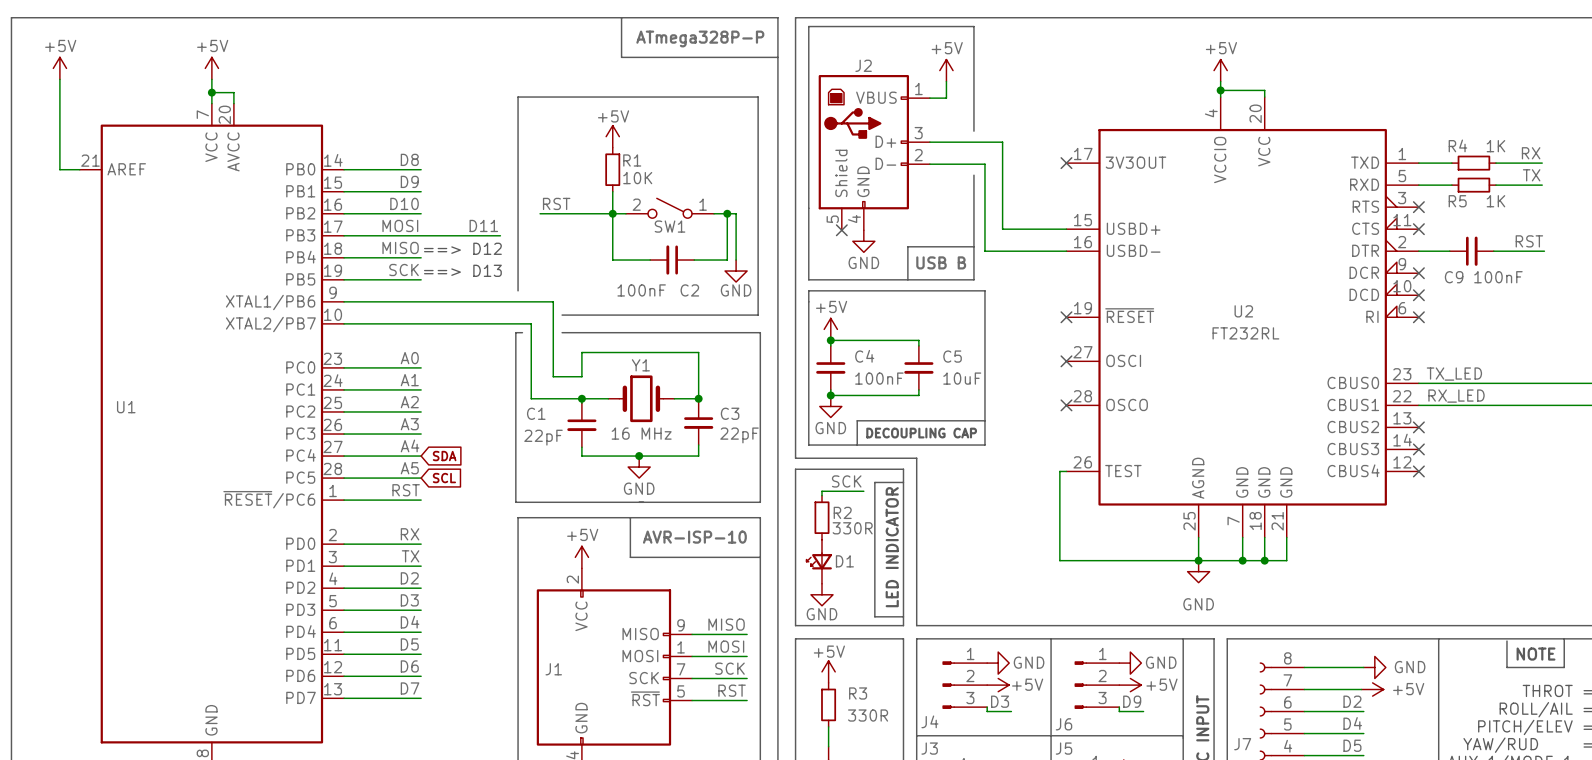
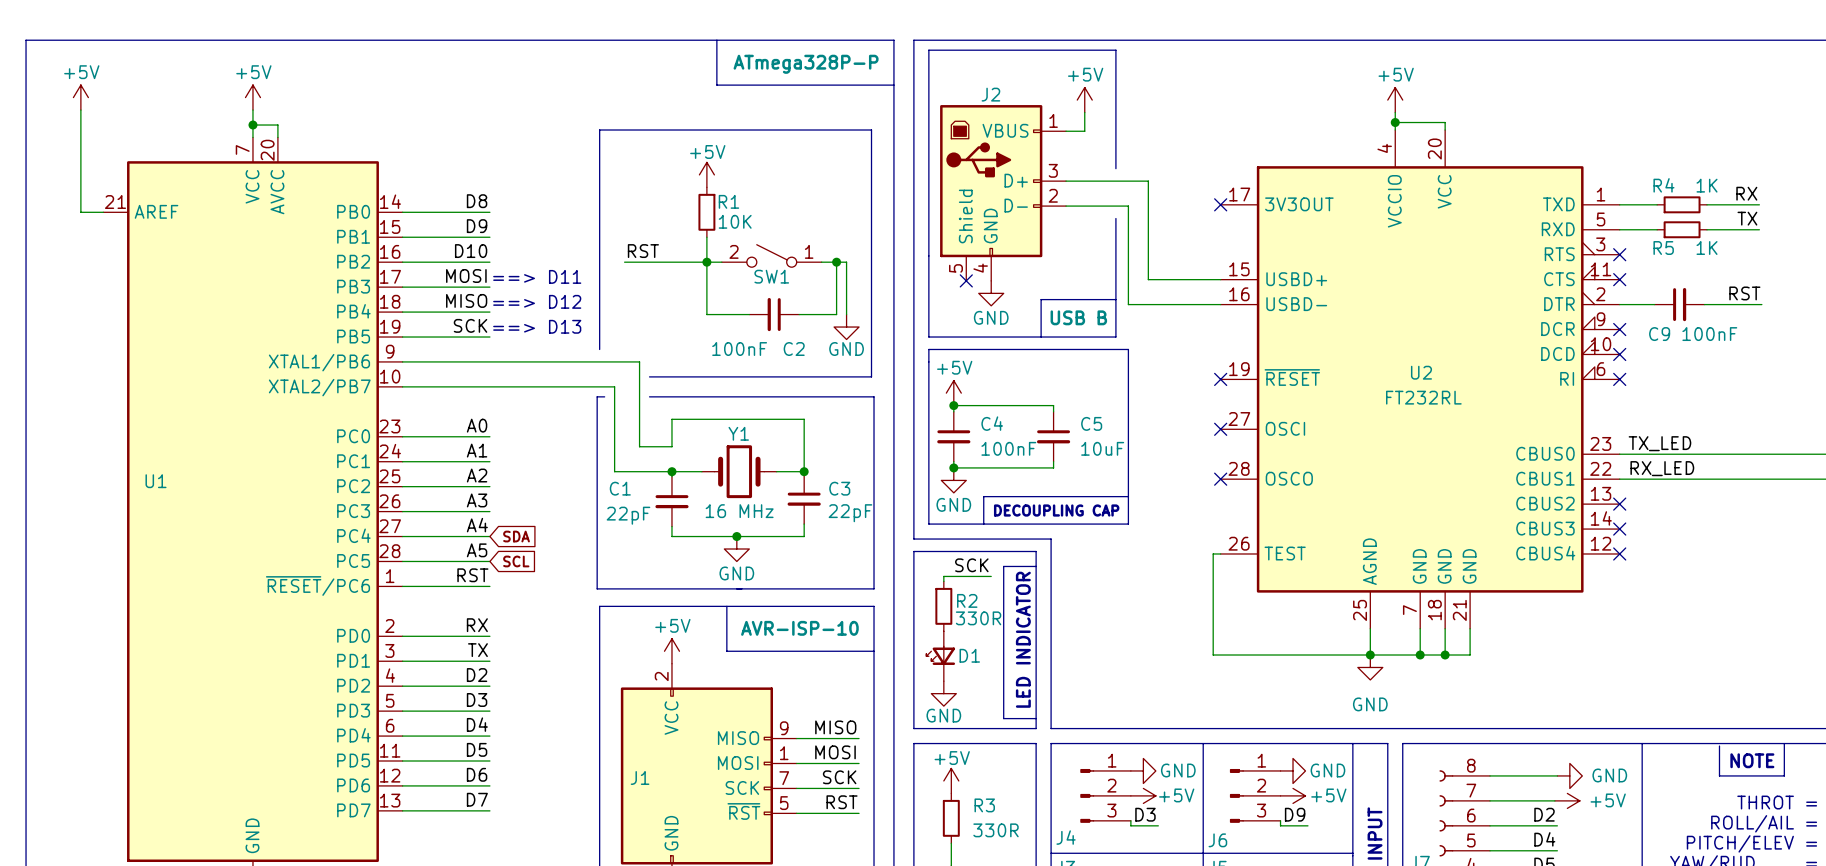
label: D11 (483, 225) -> none
text: none -> ==> D11 (537, 276)
wire: (421, 235) (500, 235) -> none

